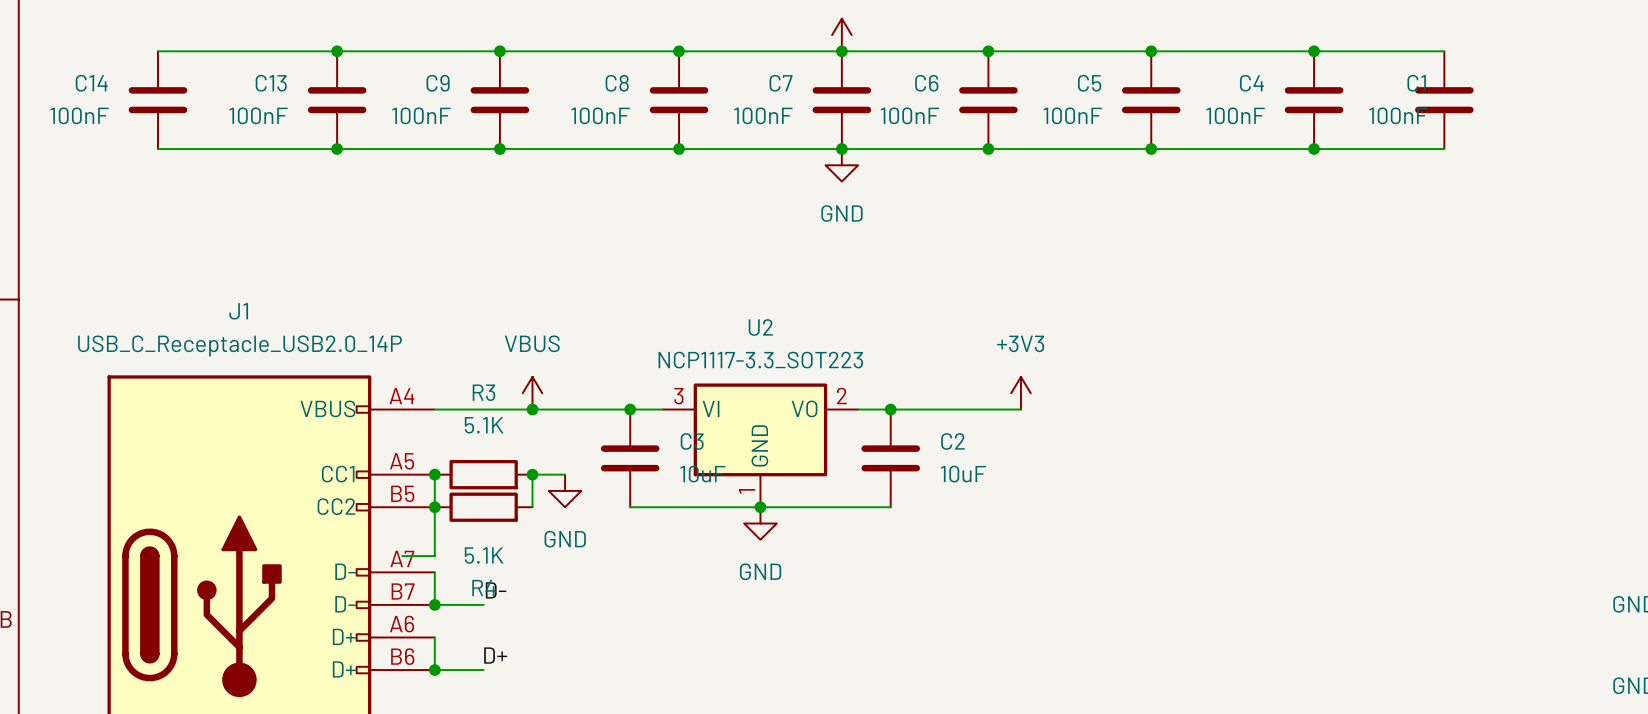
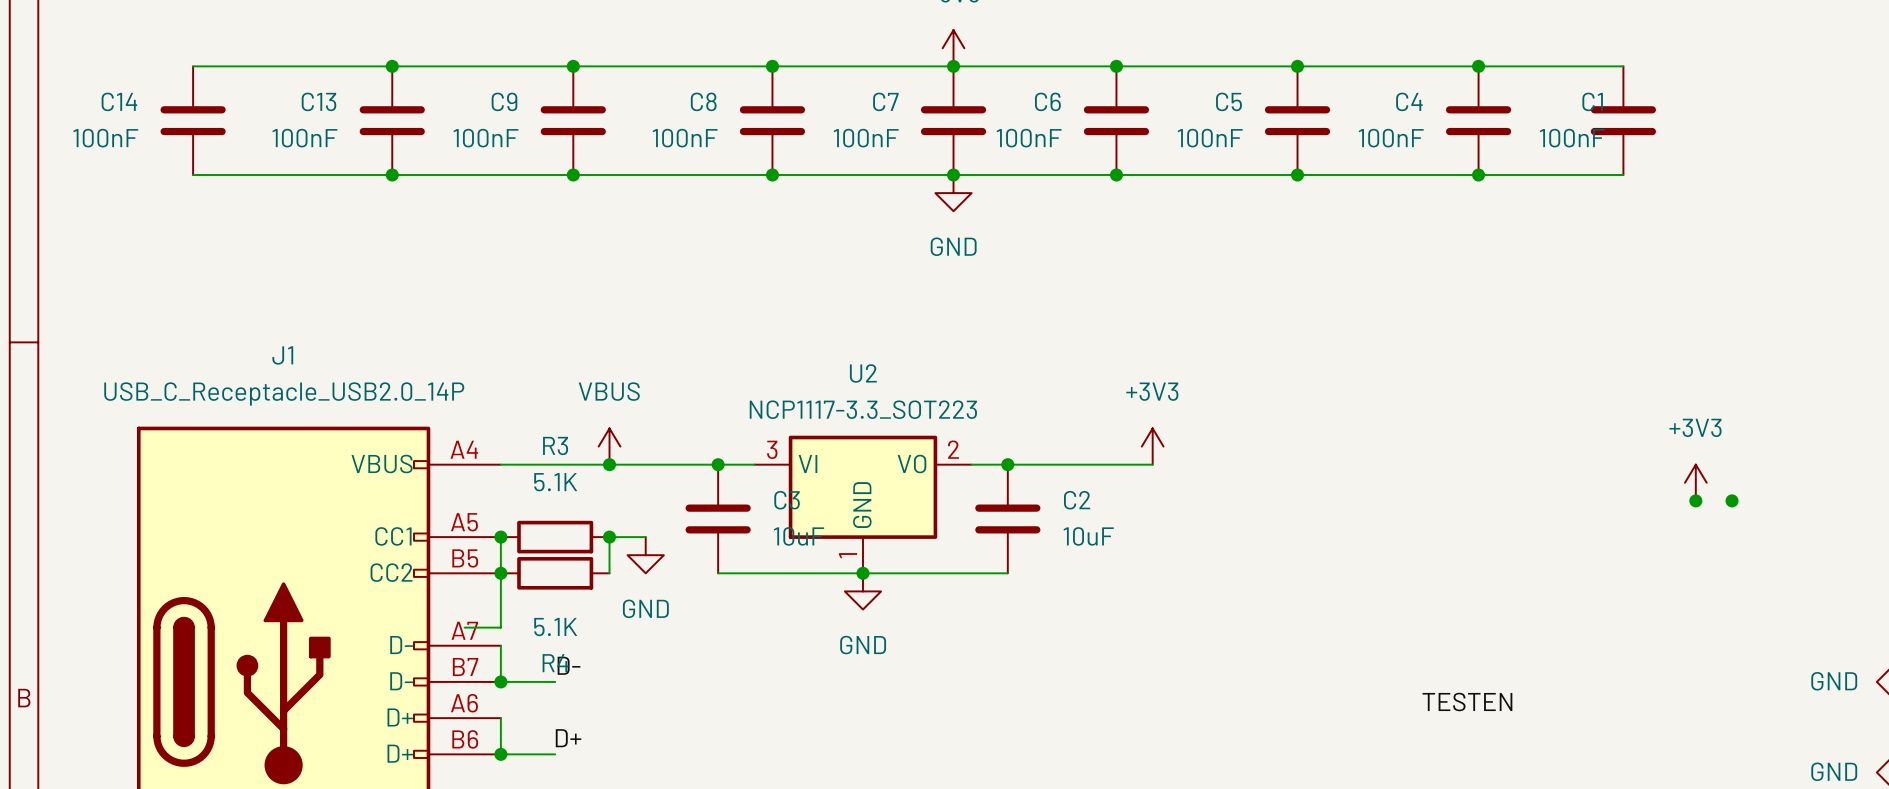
power symbol: none -> +3V3 (1695, 482)
junction: none -> (1695, 500)
junction: none -> (1732, 500)
label: none -> TESTEN (1467, 701)

